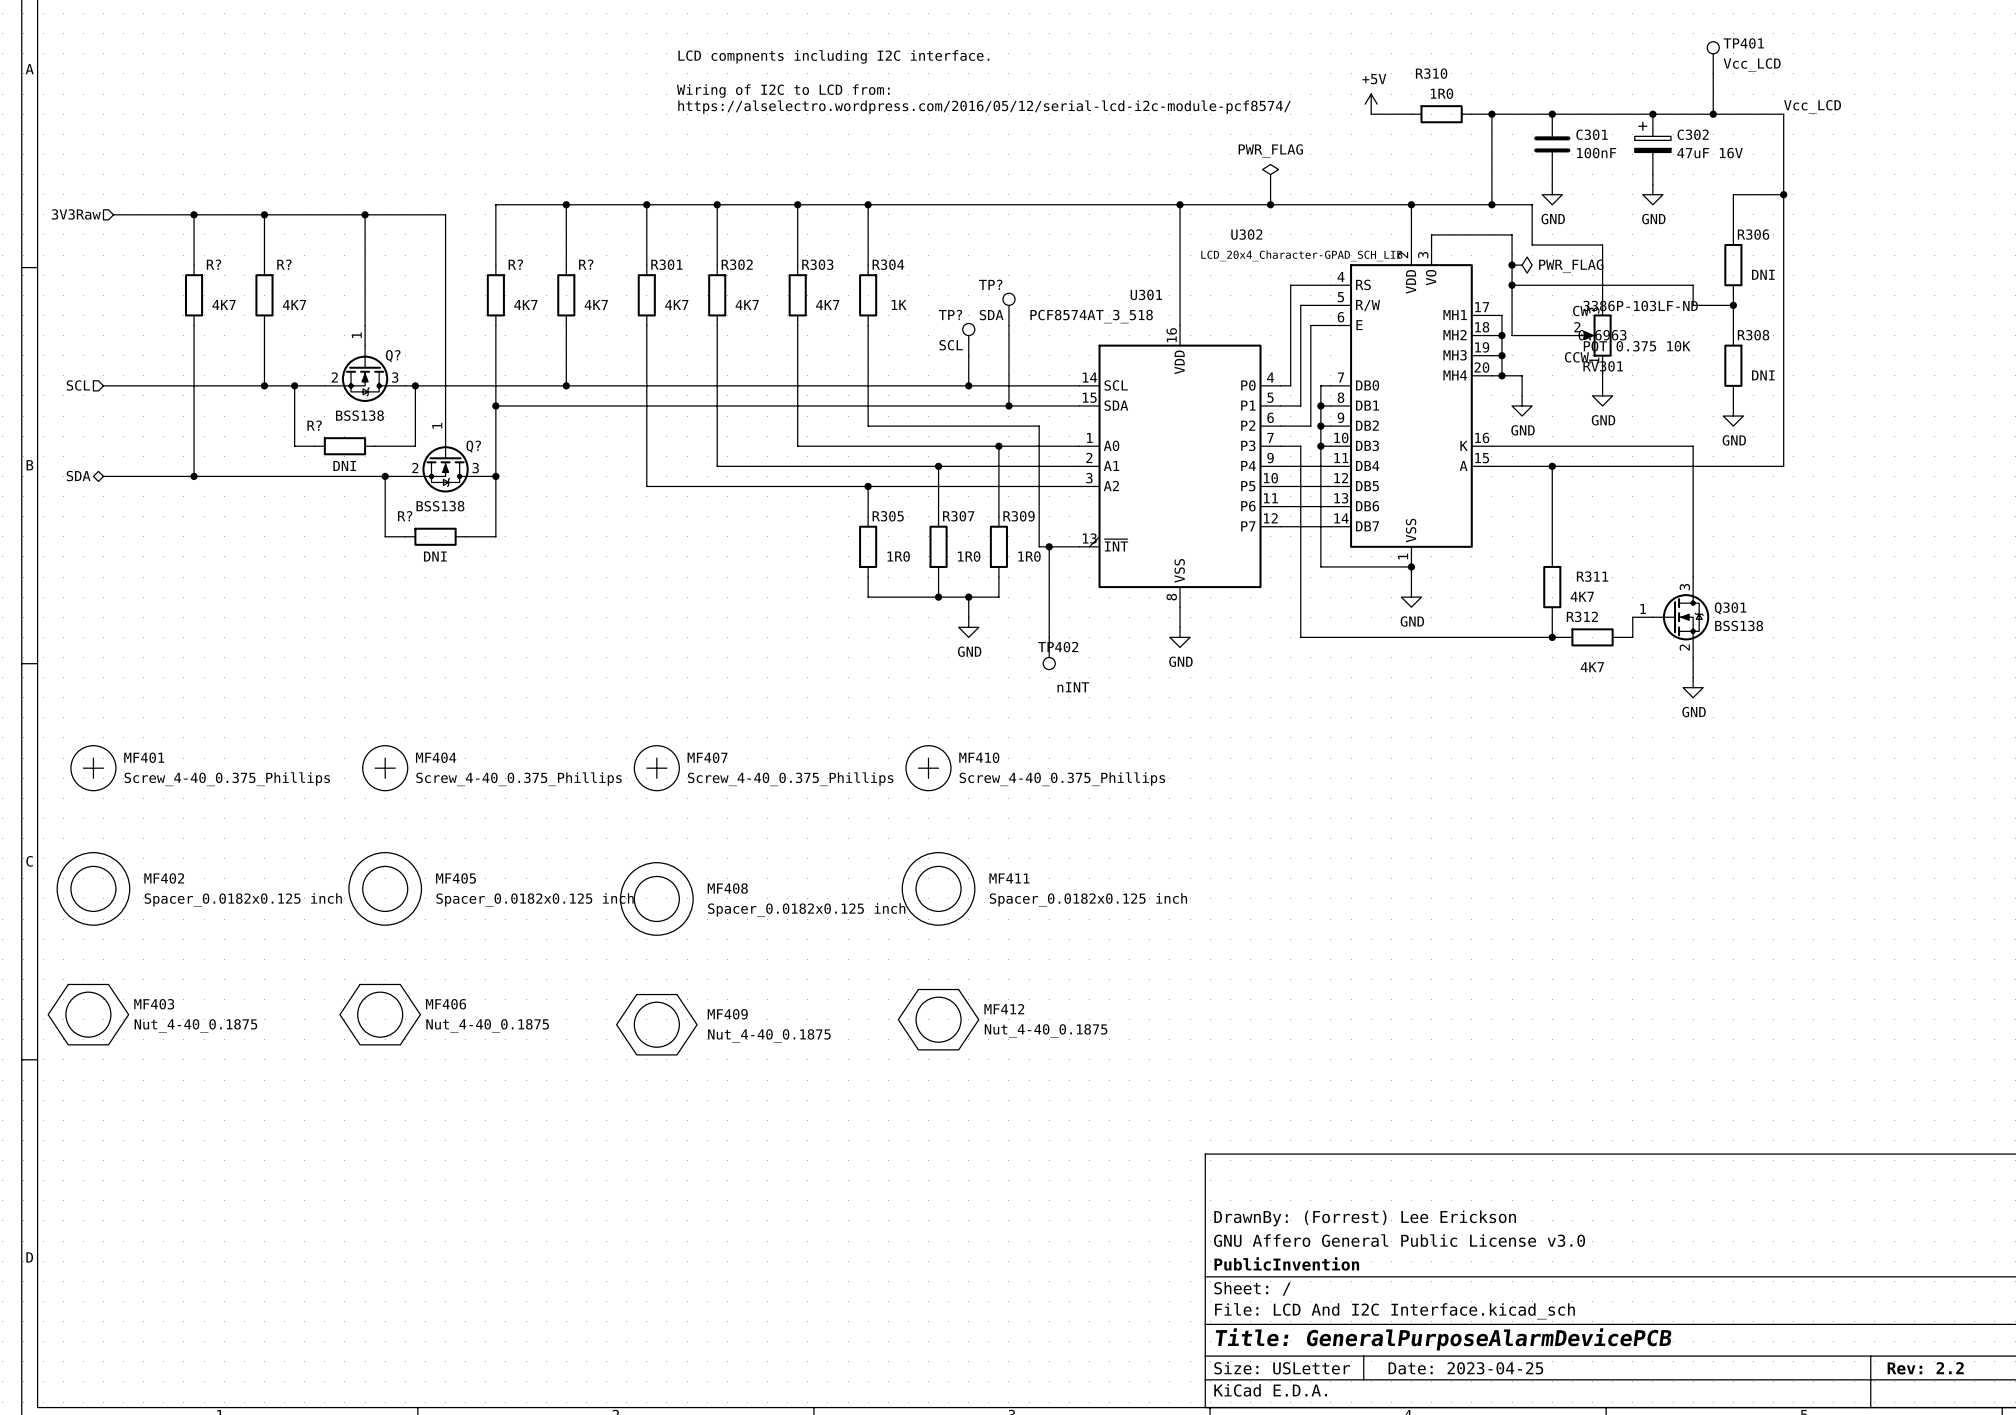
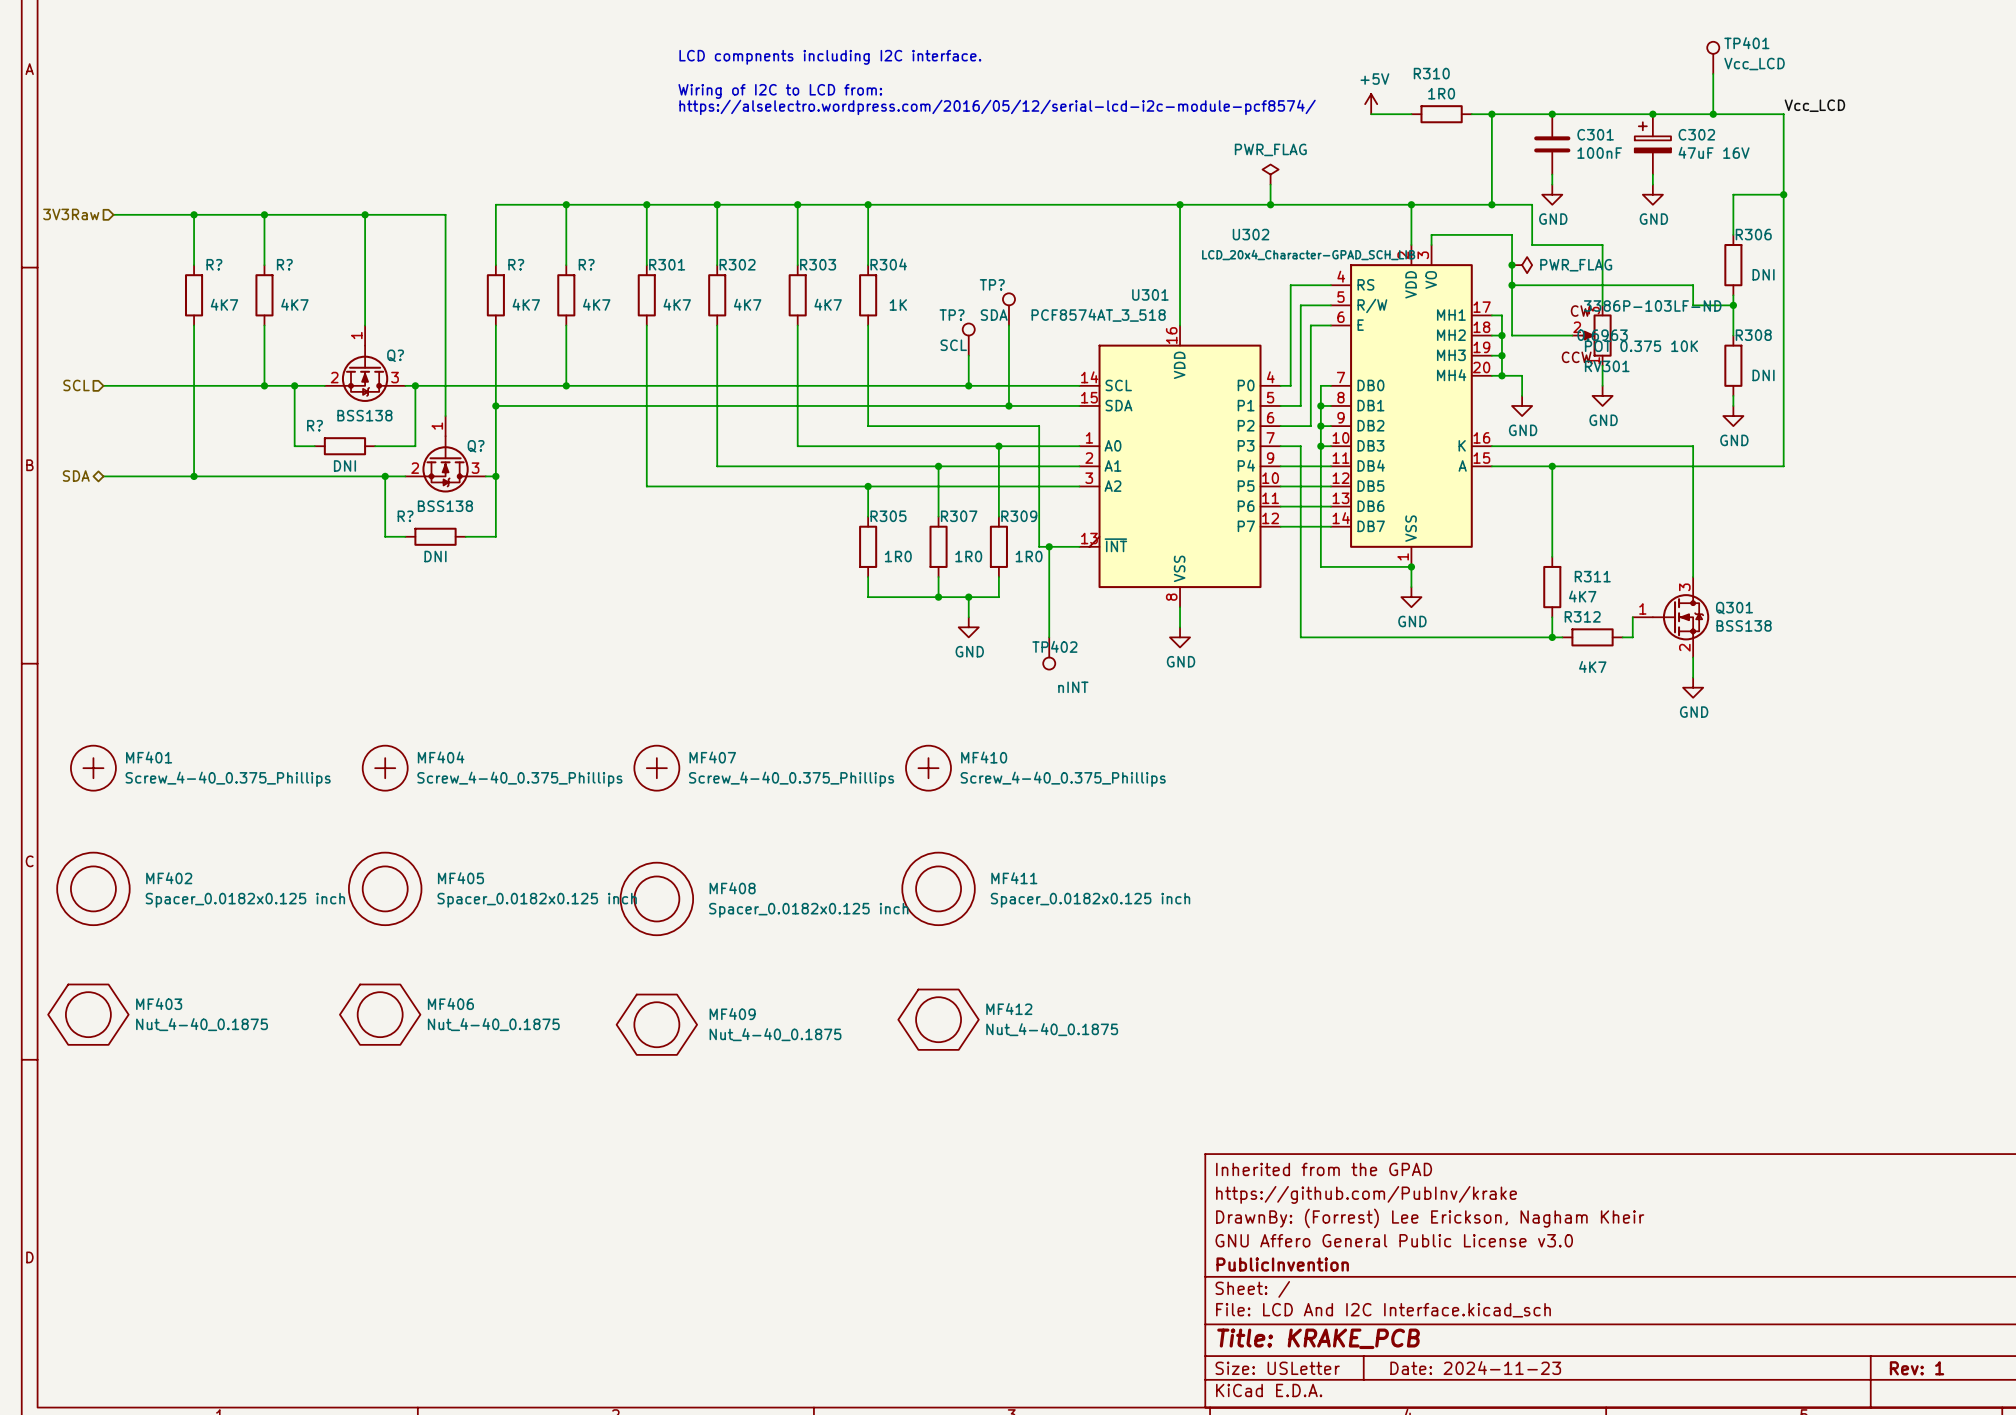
title block: none -> Inherited from the GPAD (1324, 1169)
title block: none -> https://github.com/PubInv/krake (1366, 1194)
title block: DrawnBy: (Forrest) Lee Erickson (1365, 1218) -> DrawnBy: (Forrest) Lee Erickson, Nagham Kheir (1430, 1218)
title block: Title: GeneralPurposeAlarmDevicePCB (1443, 1339) -> Title: KRAKE_PCB (1318, 1338)
title block: Date: 2023-04-25 (1465, 1368) -> Date: 2024-11-23 (1475, 1368)
title block: Rev: 2.2 (1925, 1368) -> Rev: 1 (1917, 1368)

